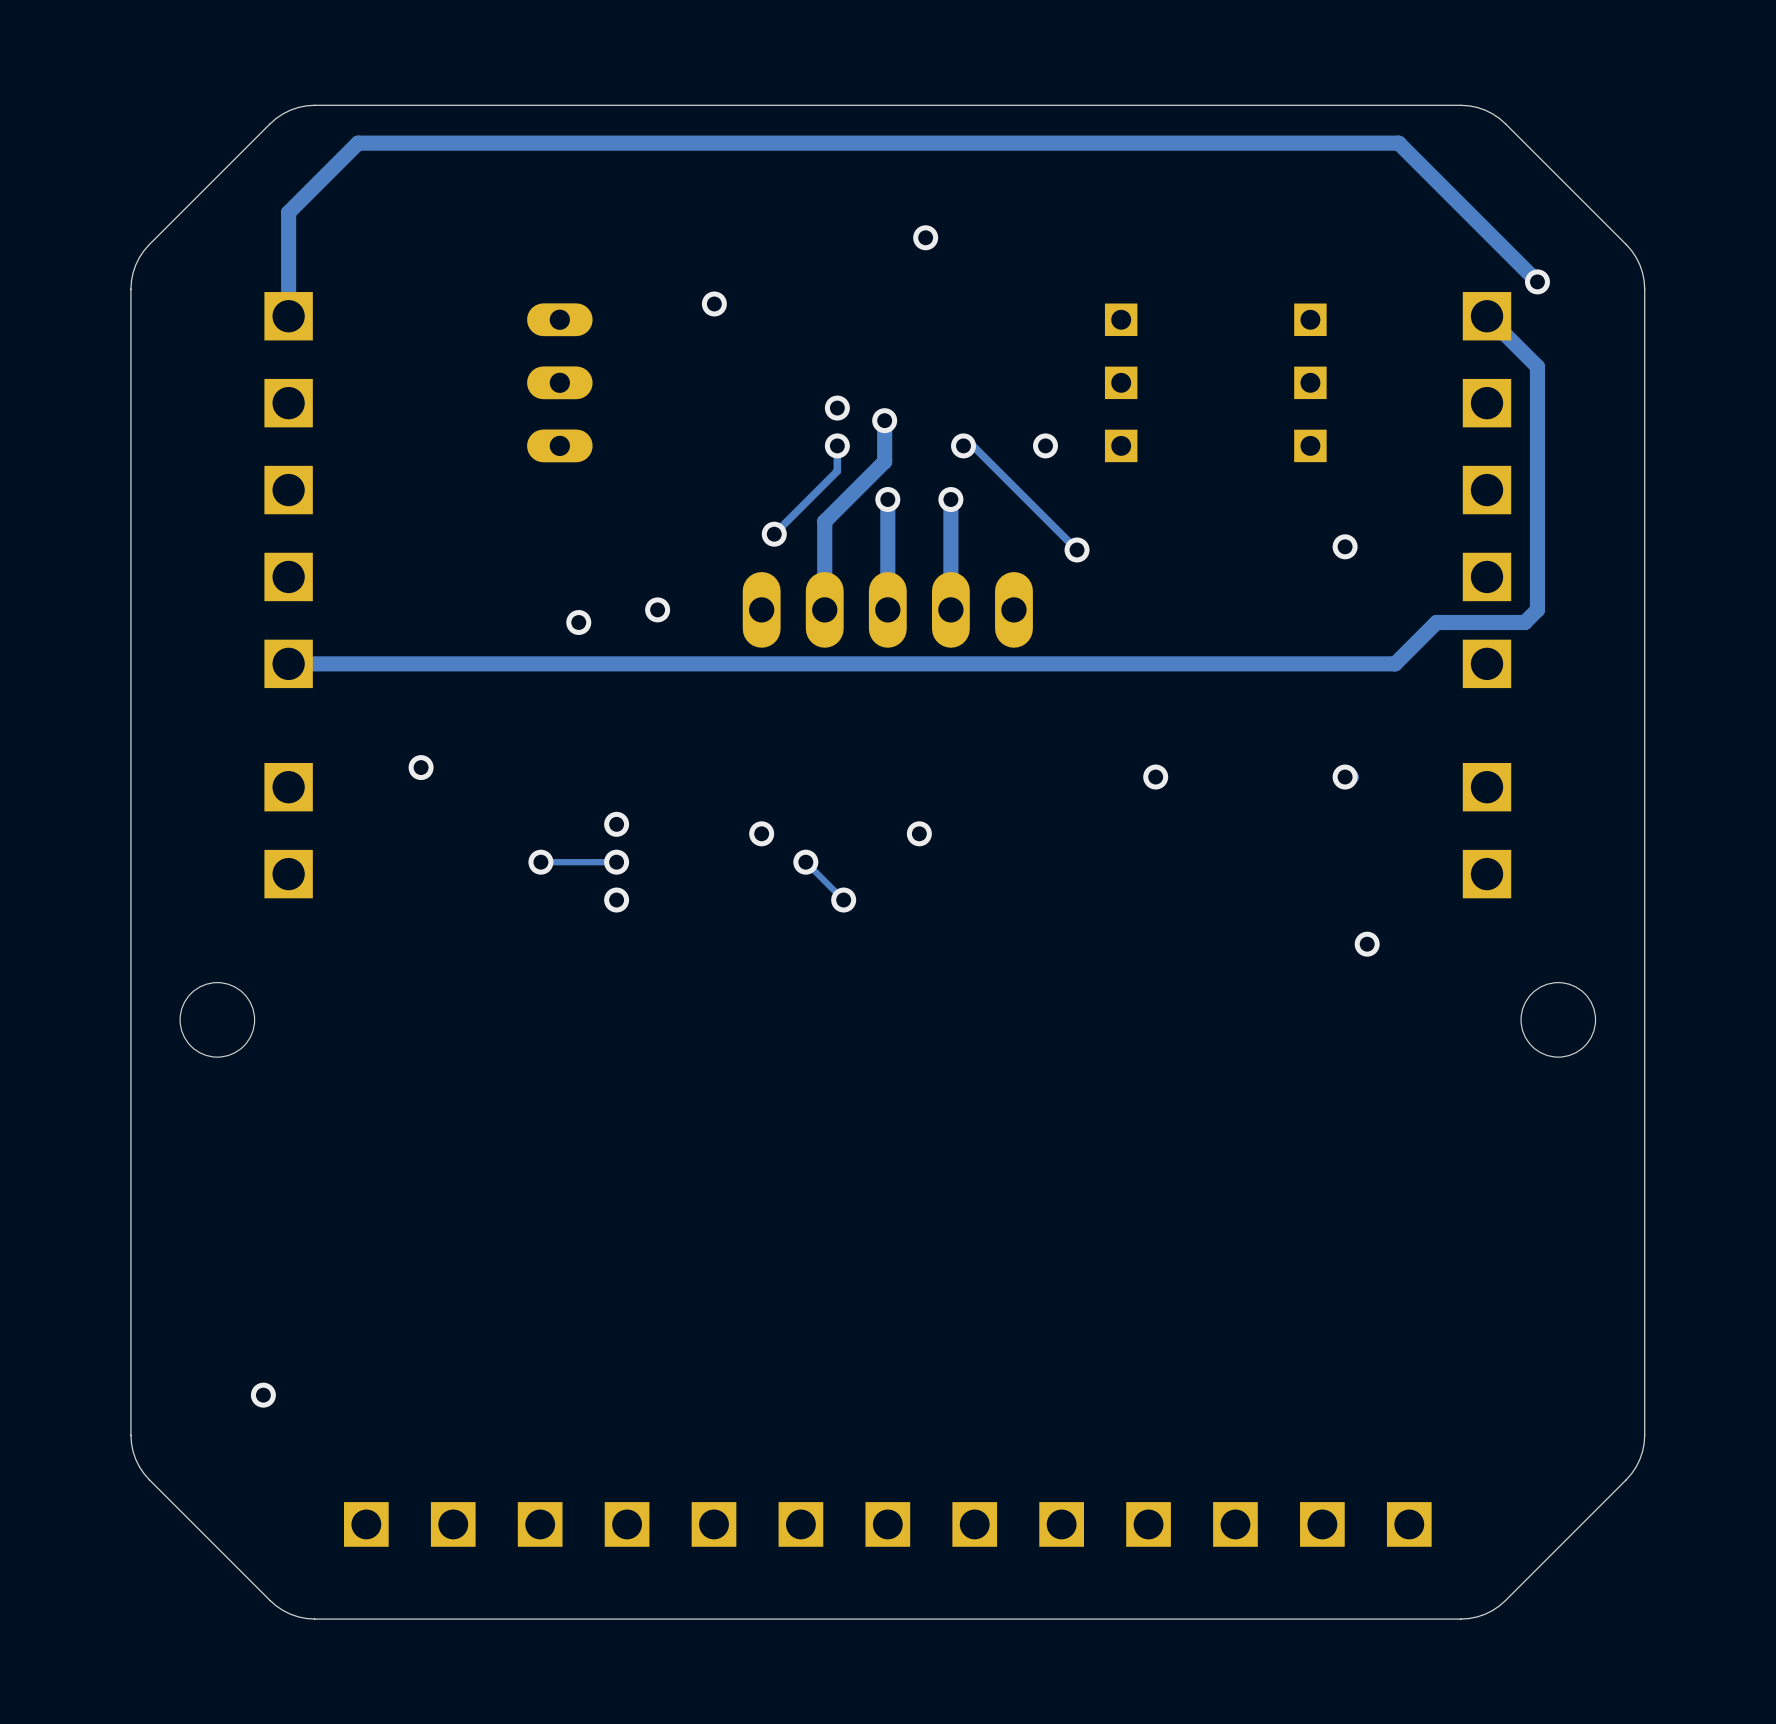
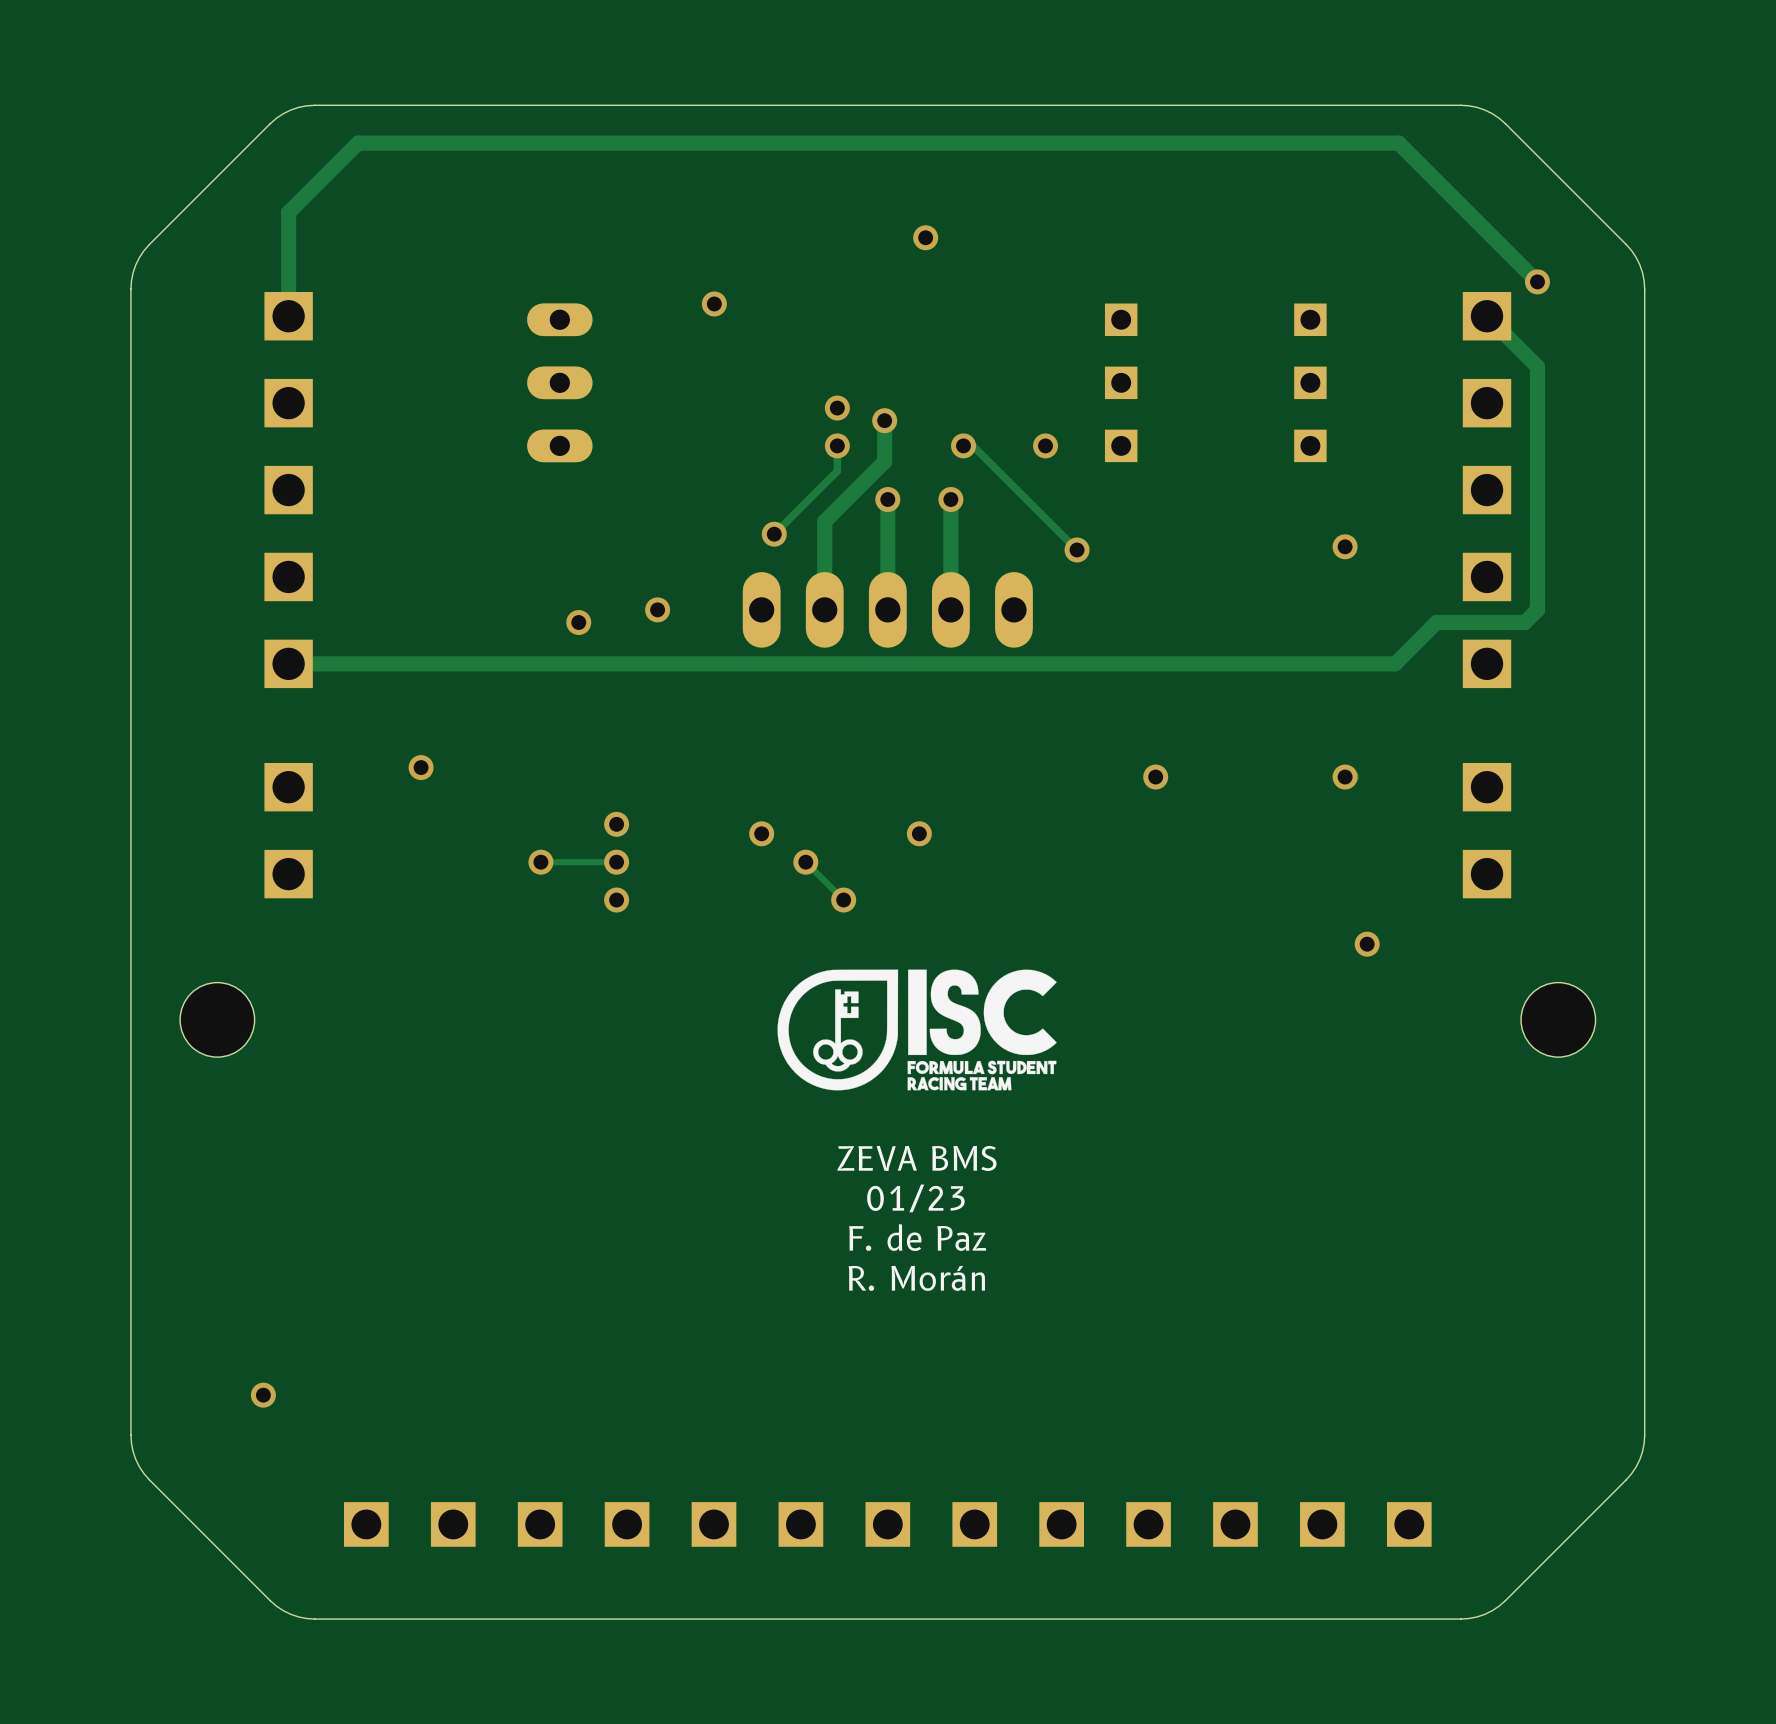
drawing: none -> [777, 969, 1057, 1091]
text: none -> ZEVA BMS (916, 1158)
text: none -> 01/23 (915, 1198)
text: none -> F. de Paz (917, 1237)
text: none -> R. Morán (916, 1278)

